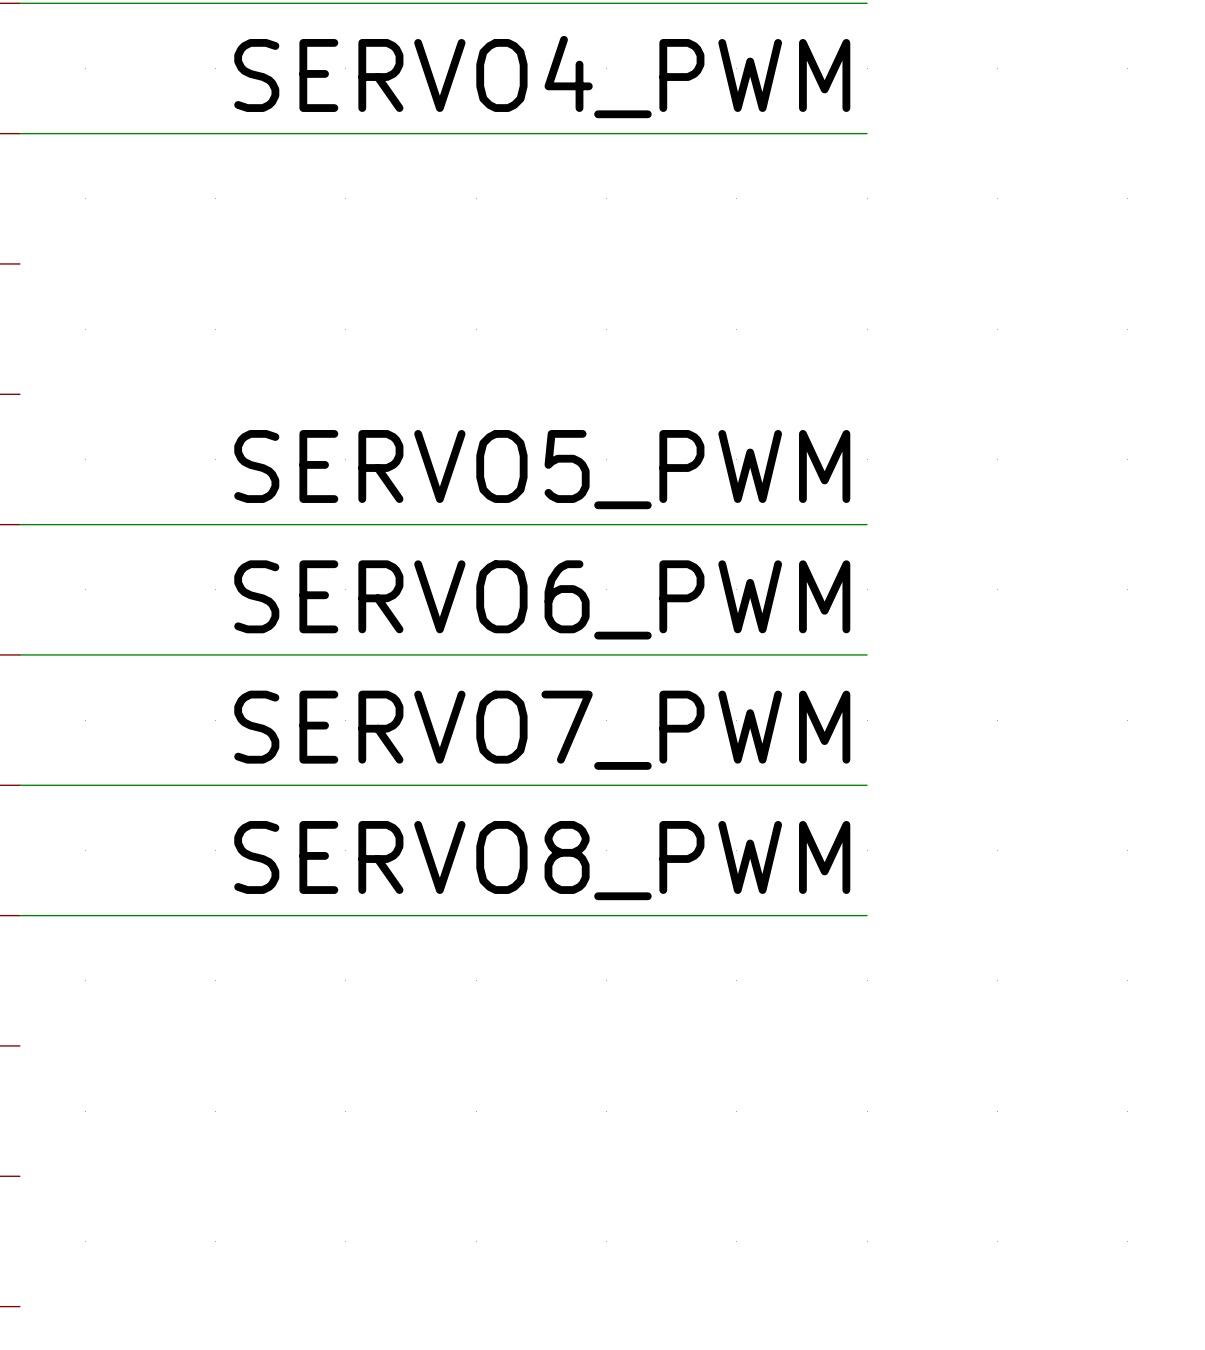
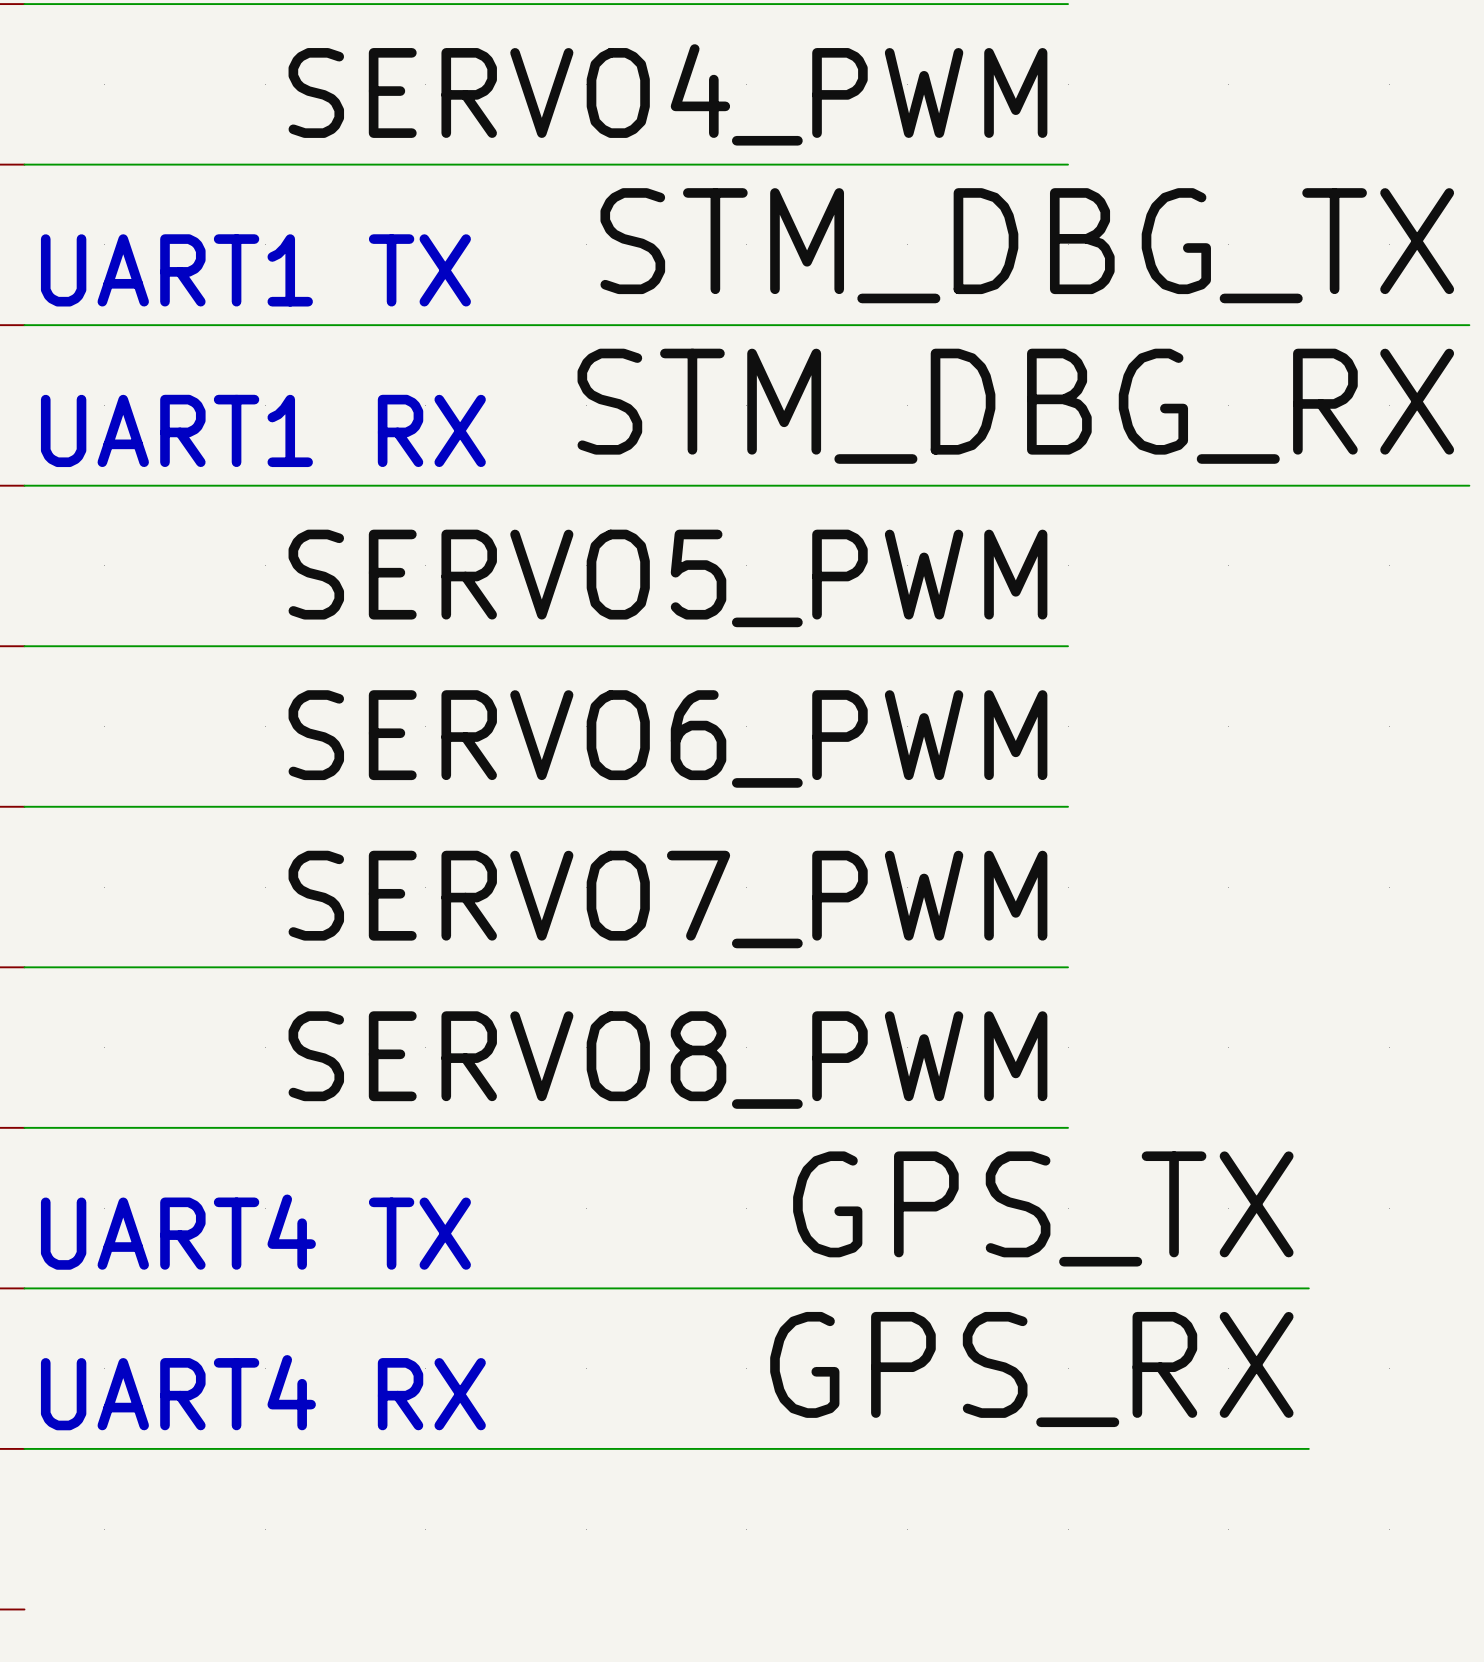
label: none -> STM_DBG_TX (1027, 245)
text: none -> UART1 TX (255, 270)
wire: none -> (24, 325) (1469, 325)
label: none -> STM_DBG_RX (1015, 406)
text: none -> UART1 RX (263, 430)
wire: none -> (24, 485) (1469, 485)
label: none -> GPS_TX (1043, 1208)
text: none -> UART4 TX (255, 1232)
wire: none -> (24, 1288) (1308, 1288)
label: none -> GPS_RX (1031, 1369)
text: none -> UART4 RX (263, 1392)
wire: none -> (24, 1448) (1308, 1448)

